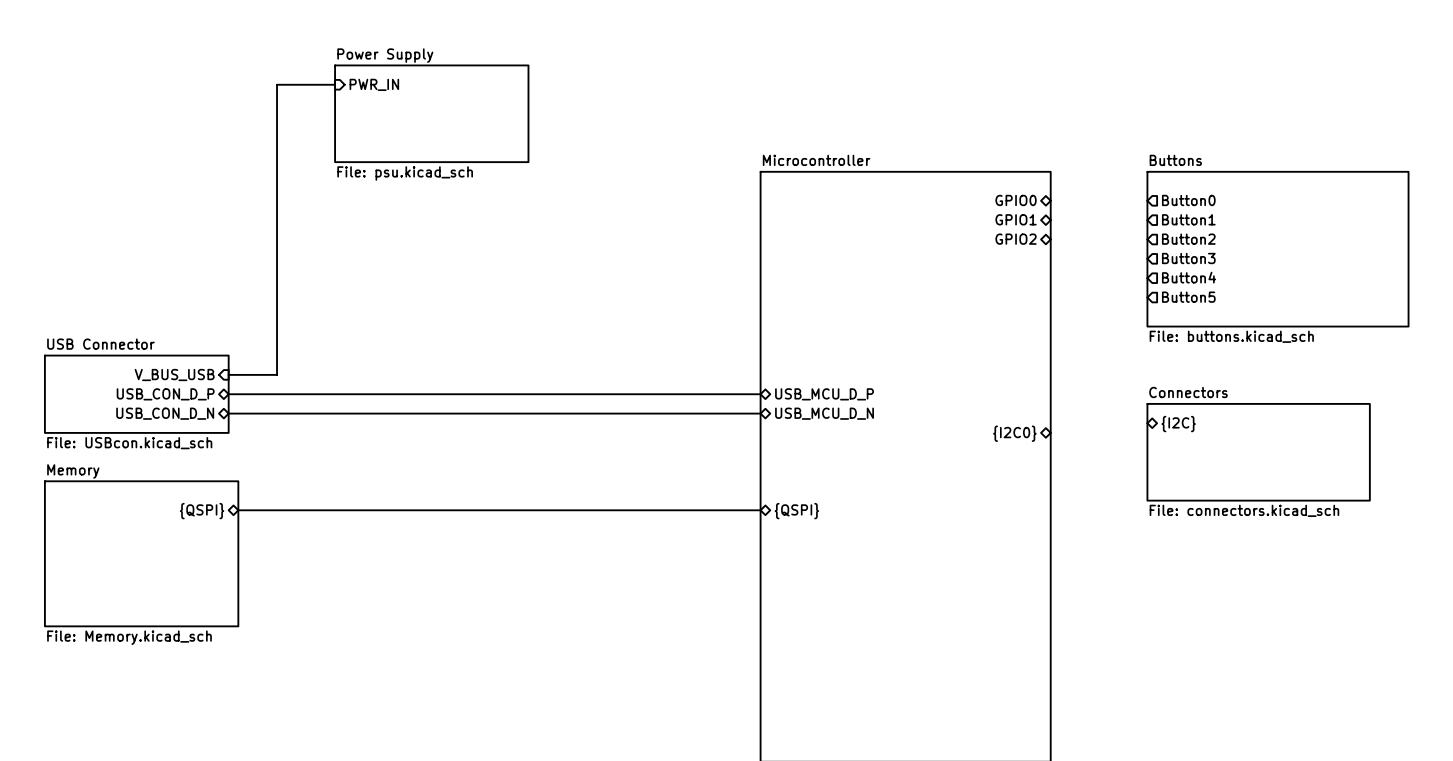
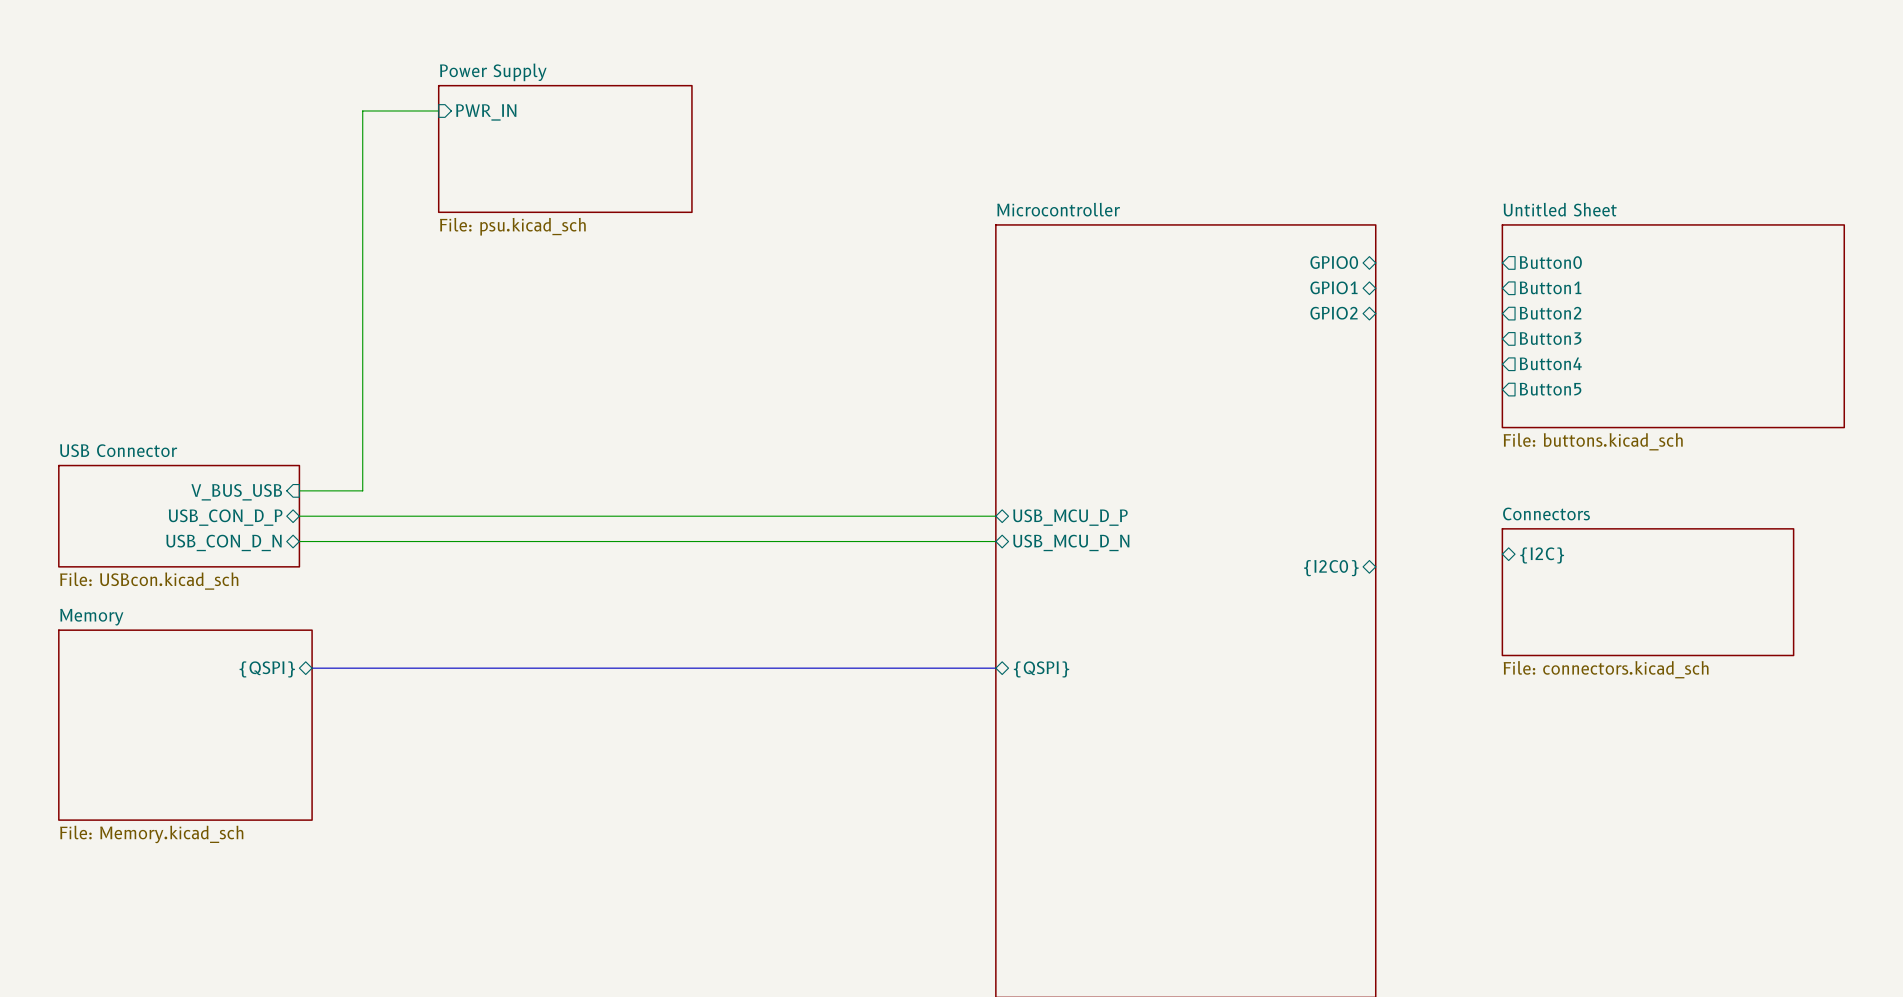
sheet Buttons name: Buttons (1175, 160) -> Untitled Sheet (1560, 209)

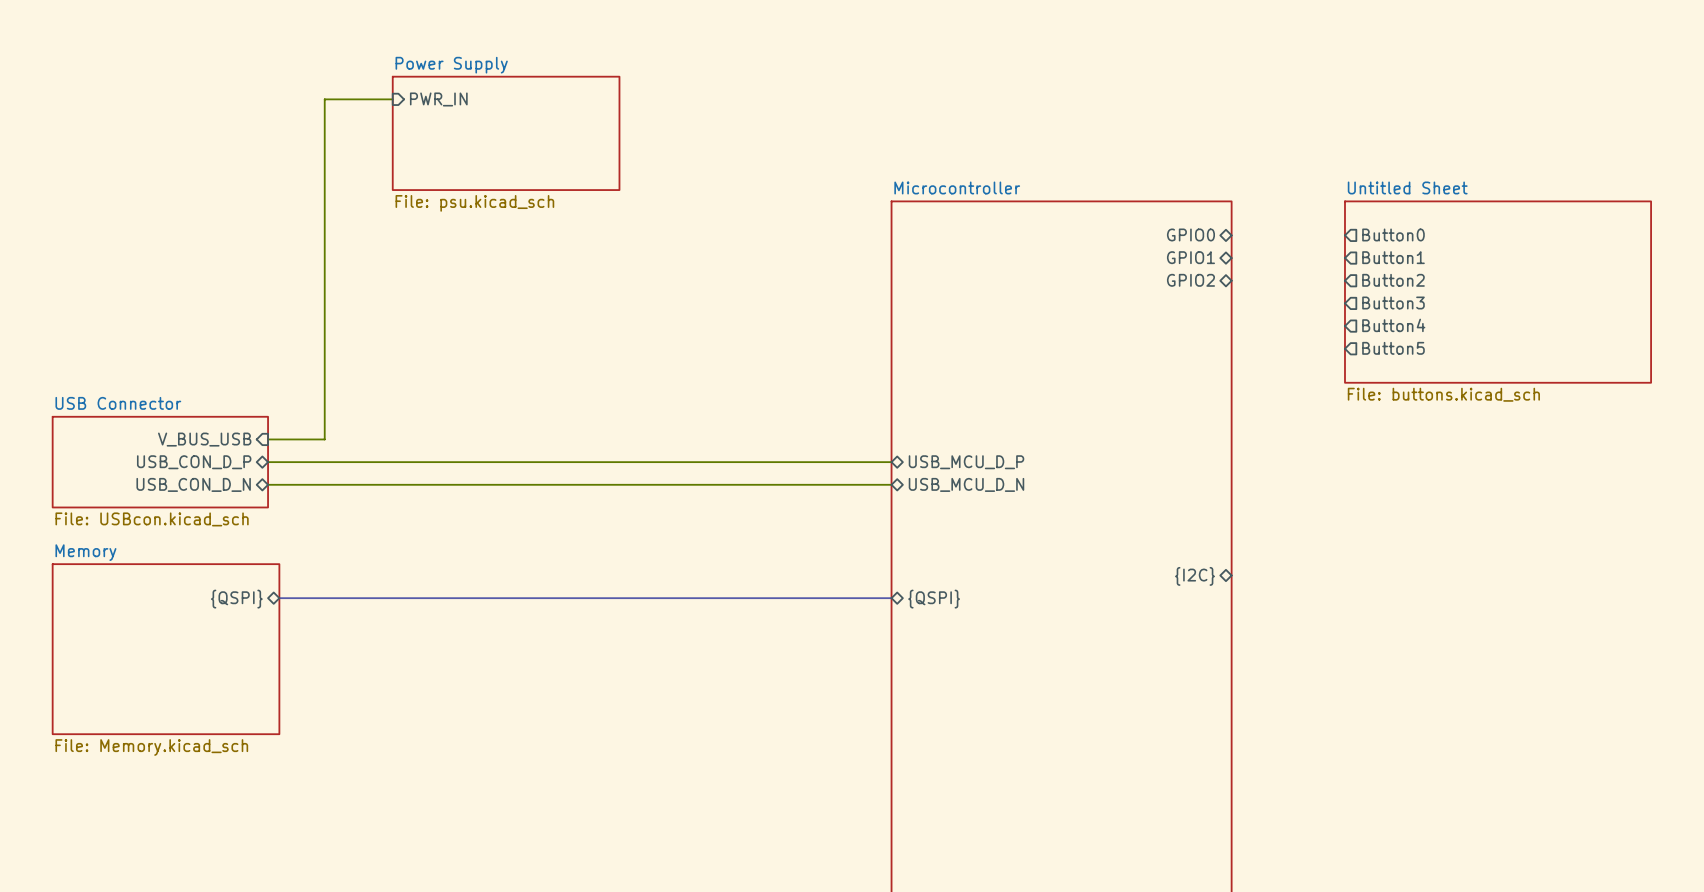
sheet pin rotation: 0° (1542, 555) -> 180° (1195, 576)
sheet pin position: {I2C} (1542, 555) -> {I2C} (1195, 576)
sheet pin: {I2C0} (1331, 568) -> none
sheet Connectors: File: connectors.kicad_sch (1647, 592) -> none

